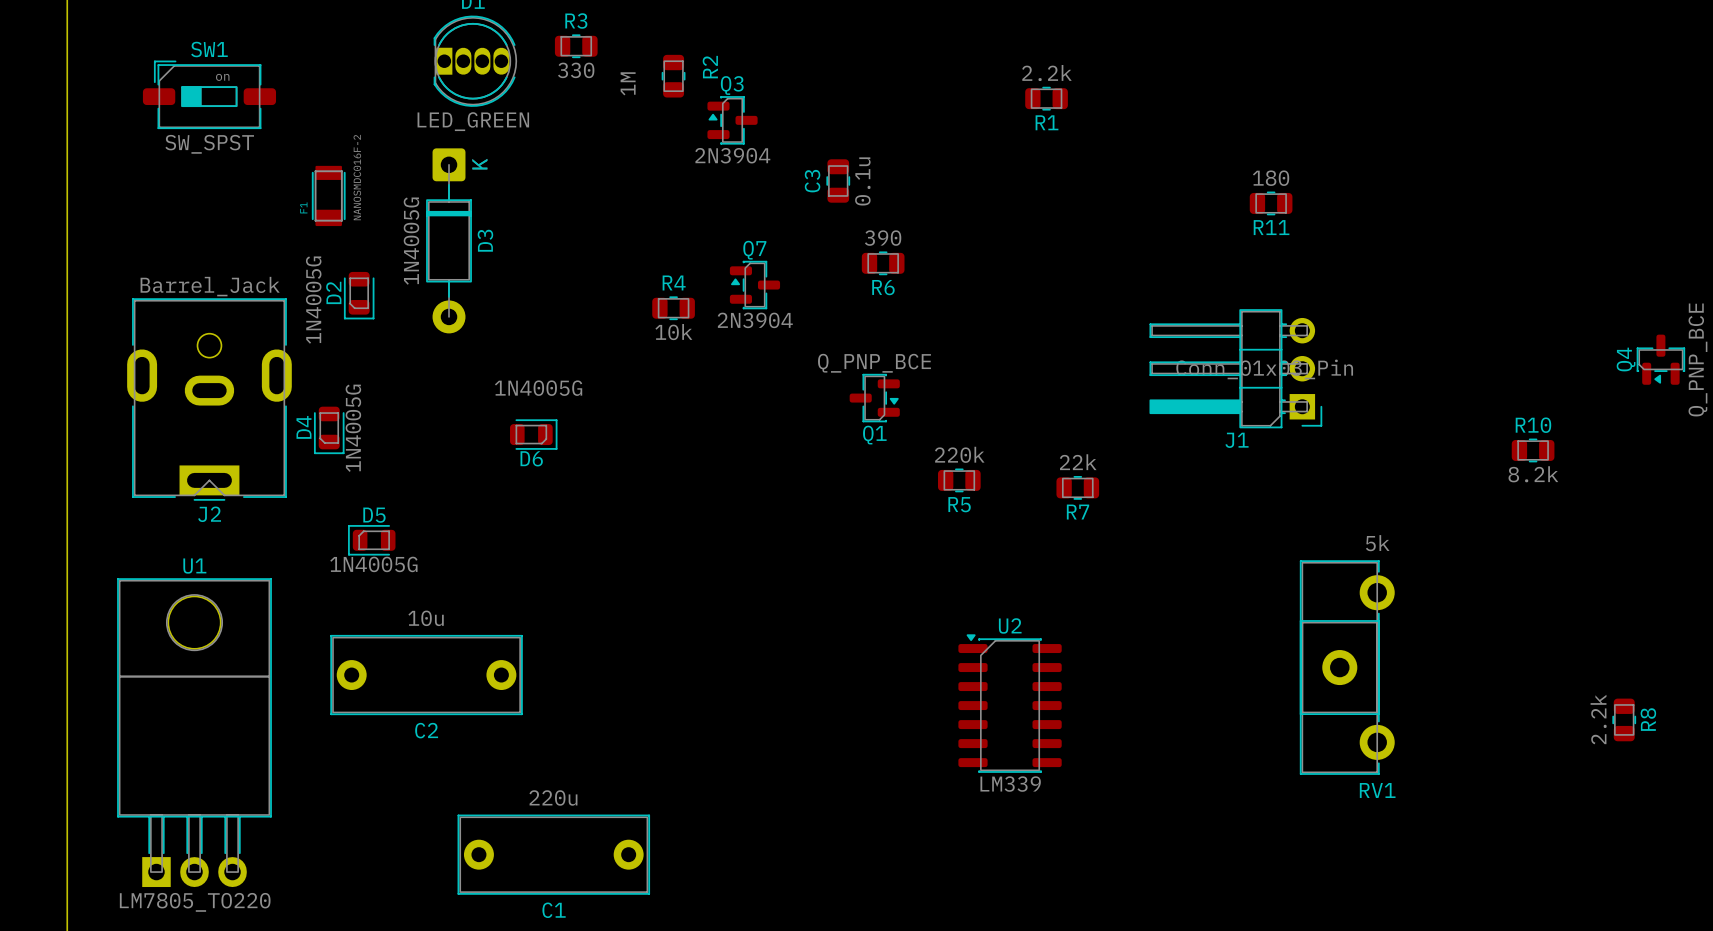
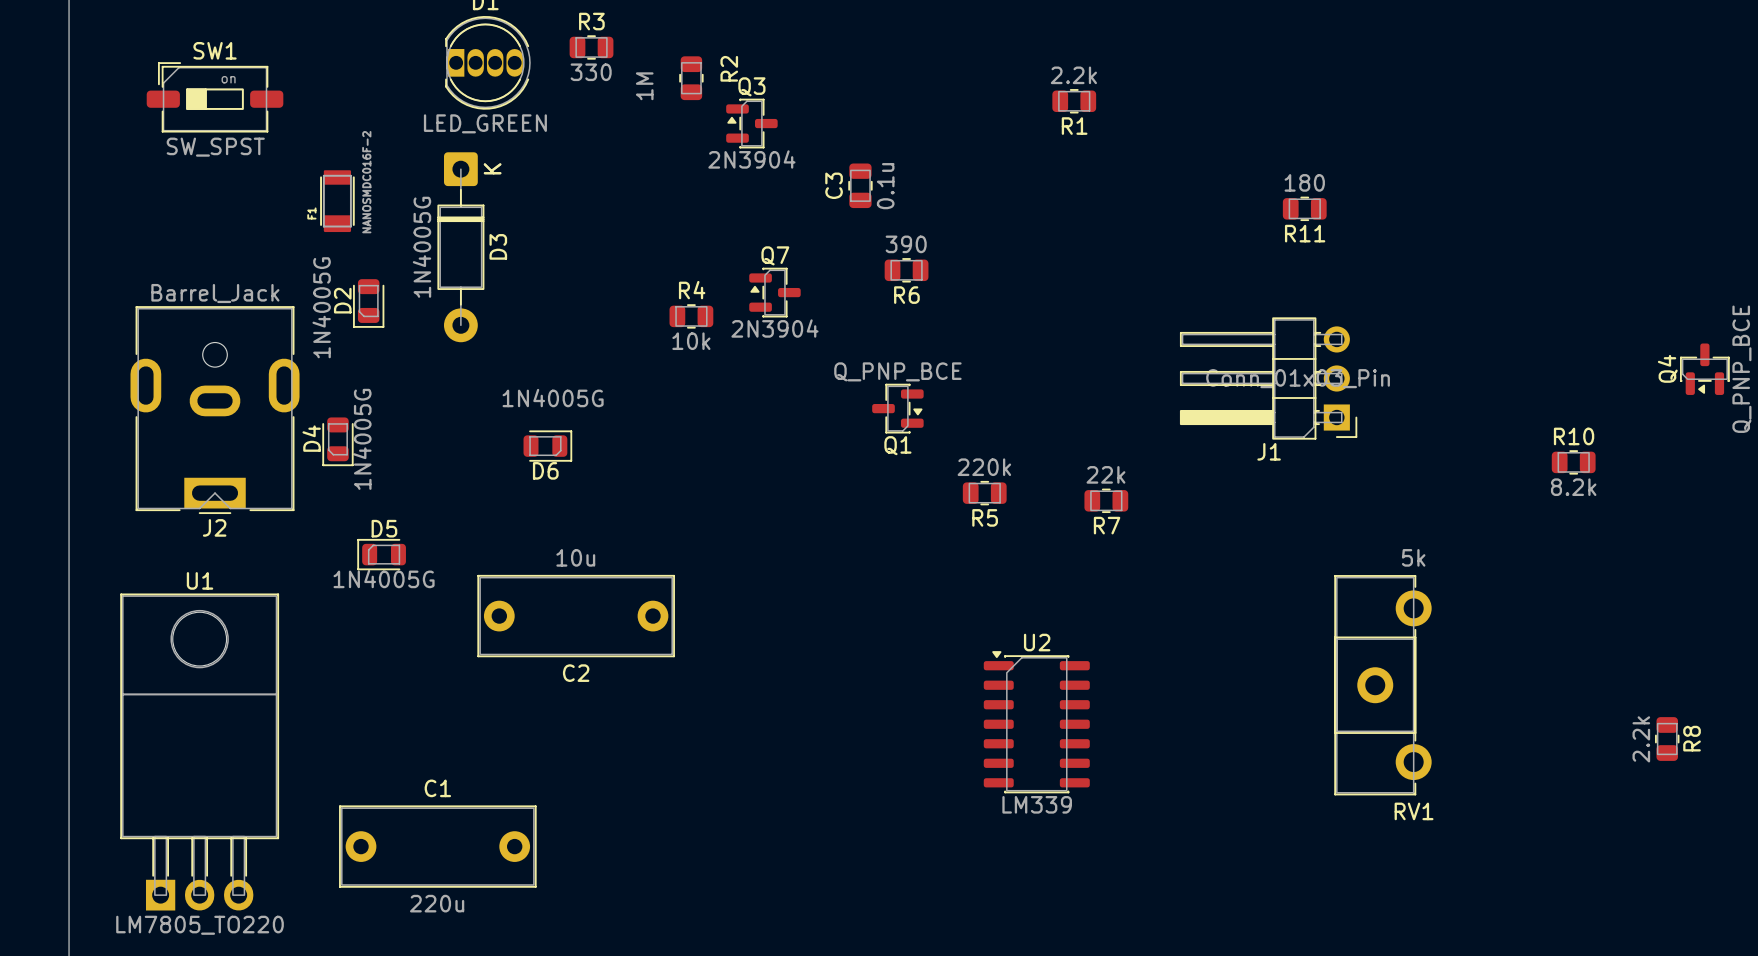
C2 position: (426, 675) -> (576, 616)
C1 value position: 220u (553, 797) -> 220u (437, 903)
C1 position: (553, 854) -> (437, 846)
C1 name position: C1 (554, 910) -> C1 (437, 788)

